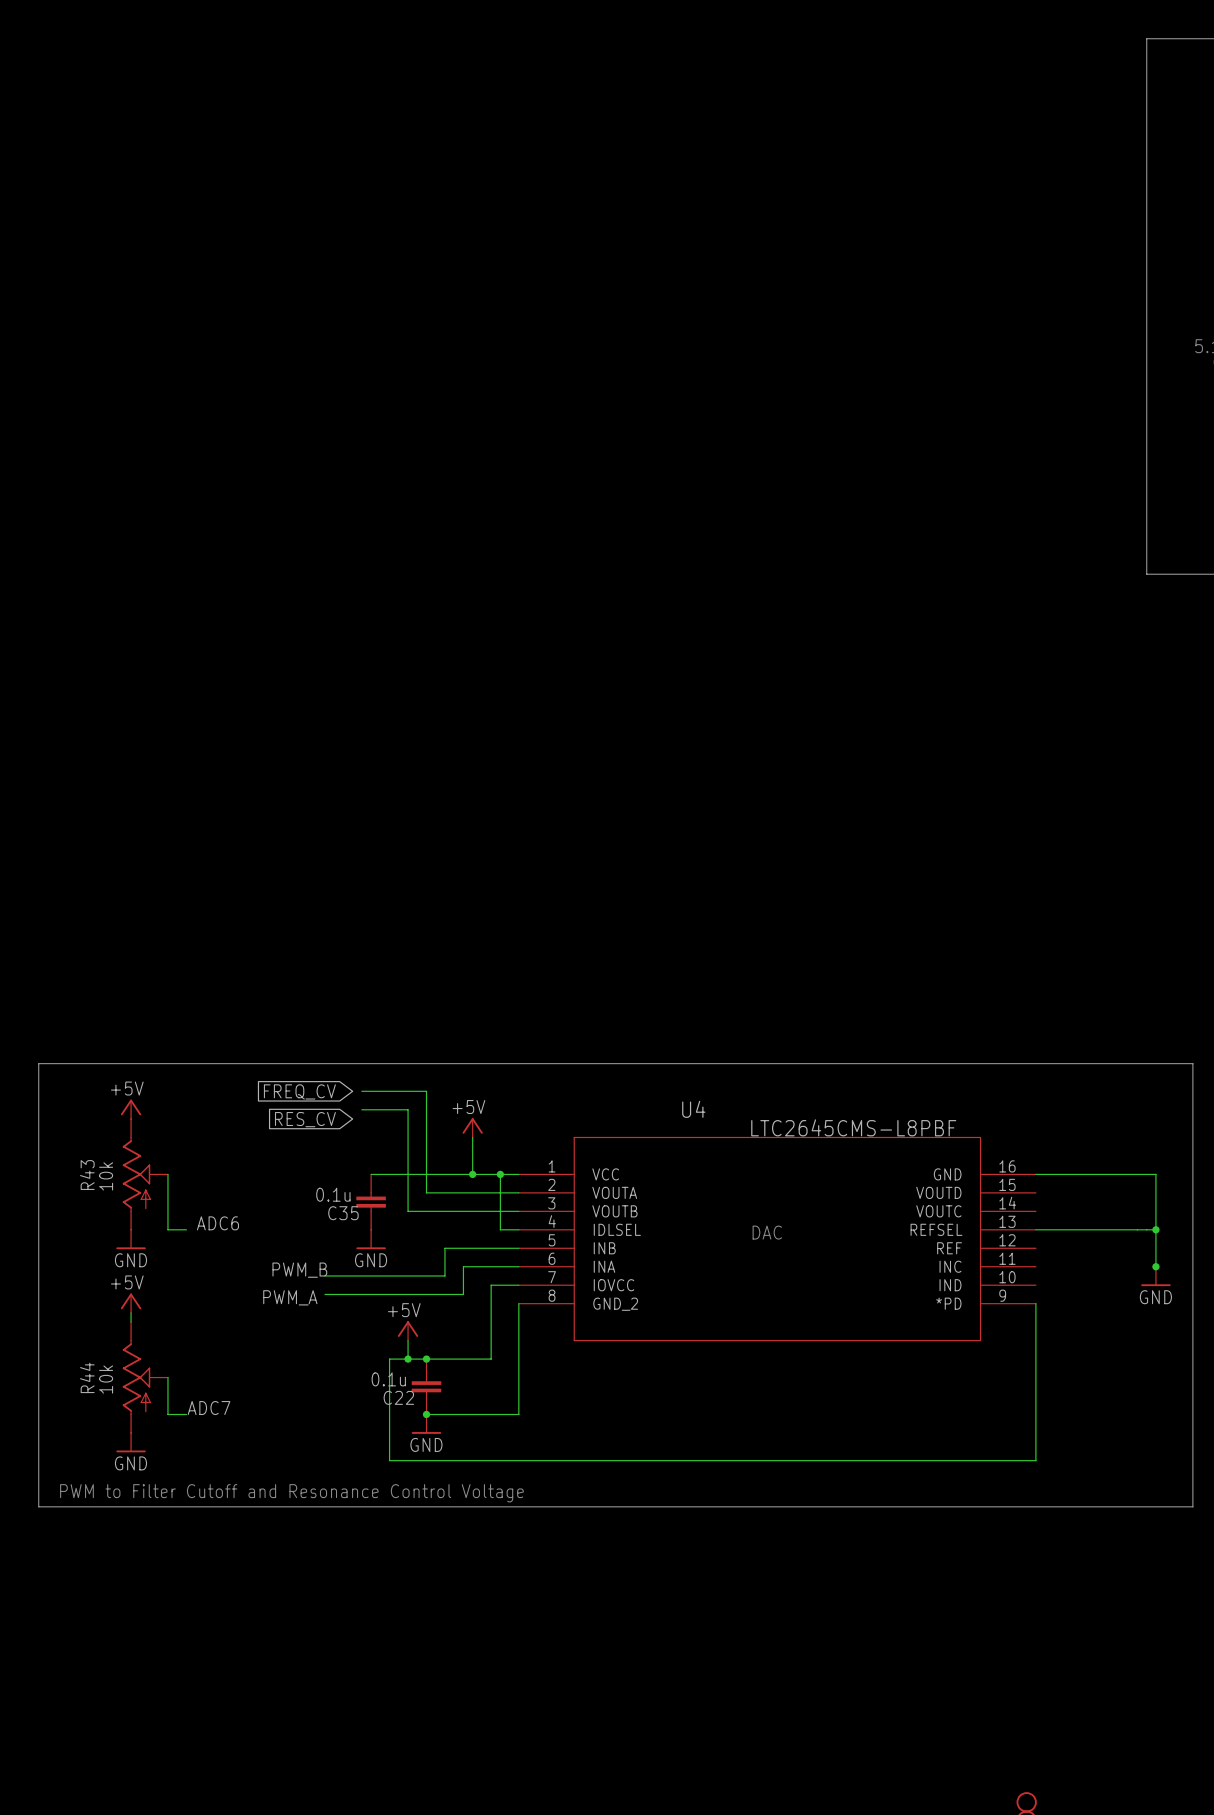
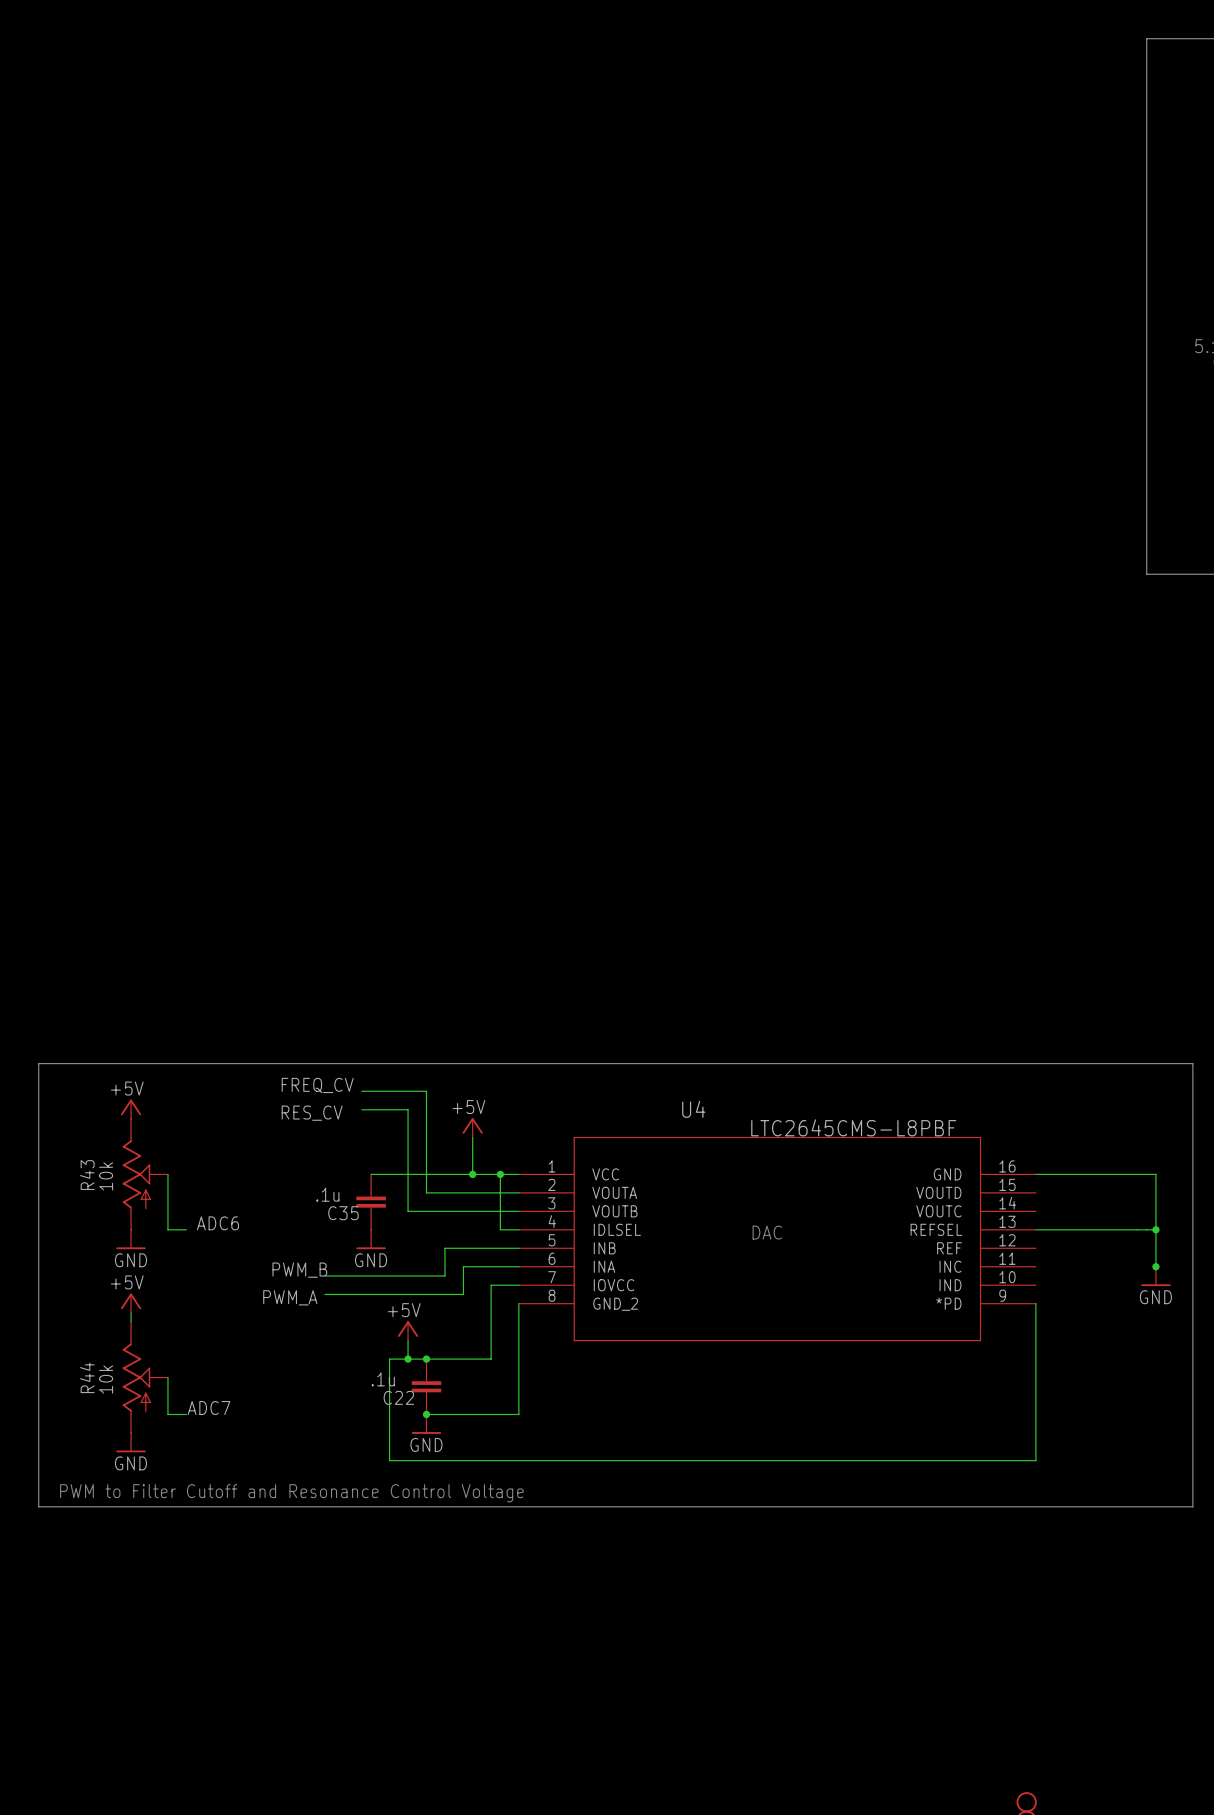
label: none -> FREQ_CV (317, 1085)
global label: FREQ_CV (299, 1091) -> none
label: none -> RES_CV (312, 1113)
global label: RES_CV (305, 1119) -> none
C35 value: 0.1u (333, 1194) -> .1u (327, 1194)
C22 value: 0.1u (388, 1379) -> .1u (383, 1379)

